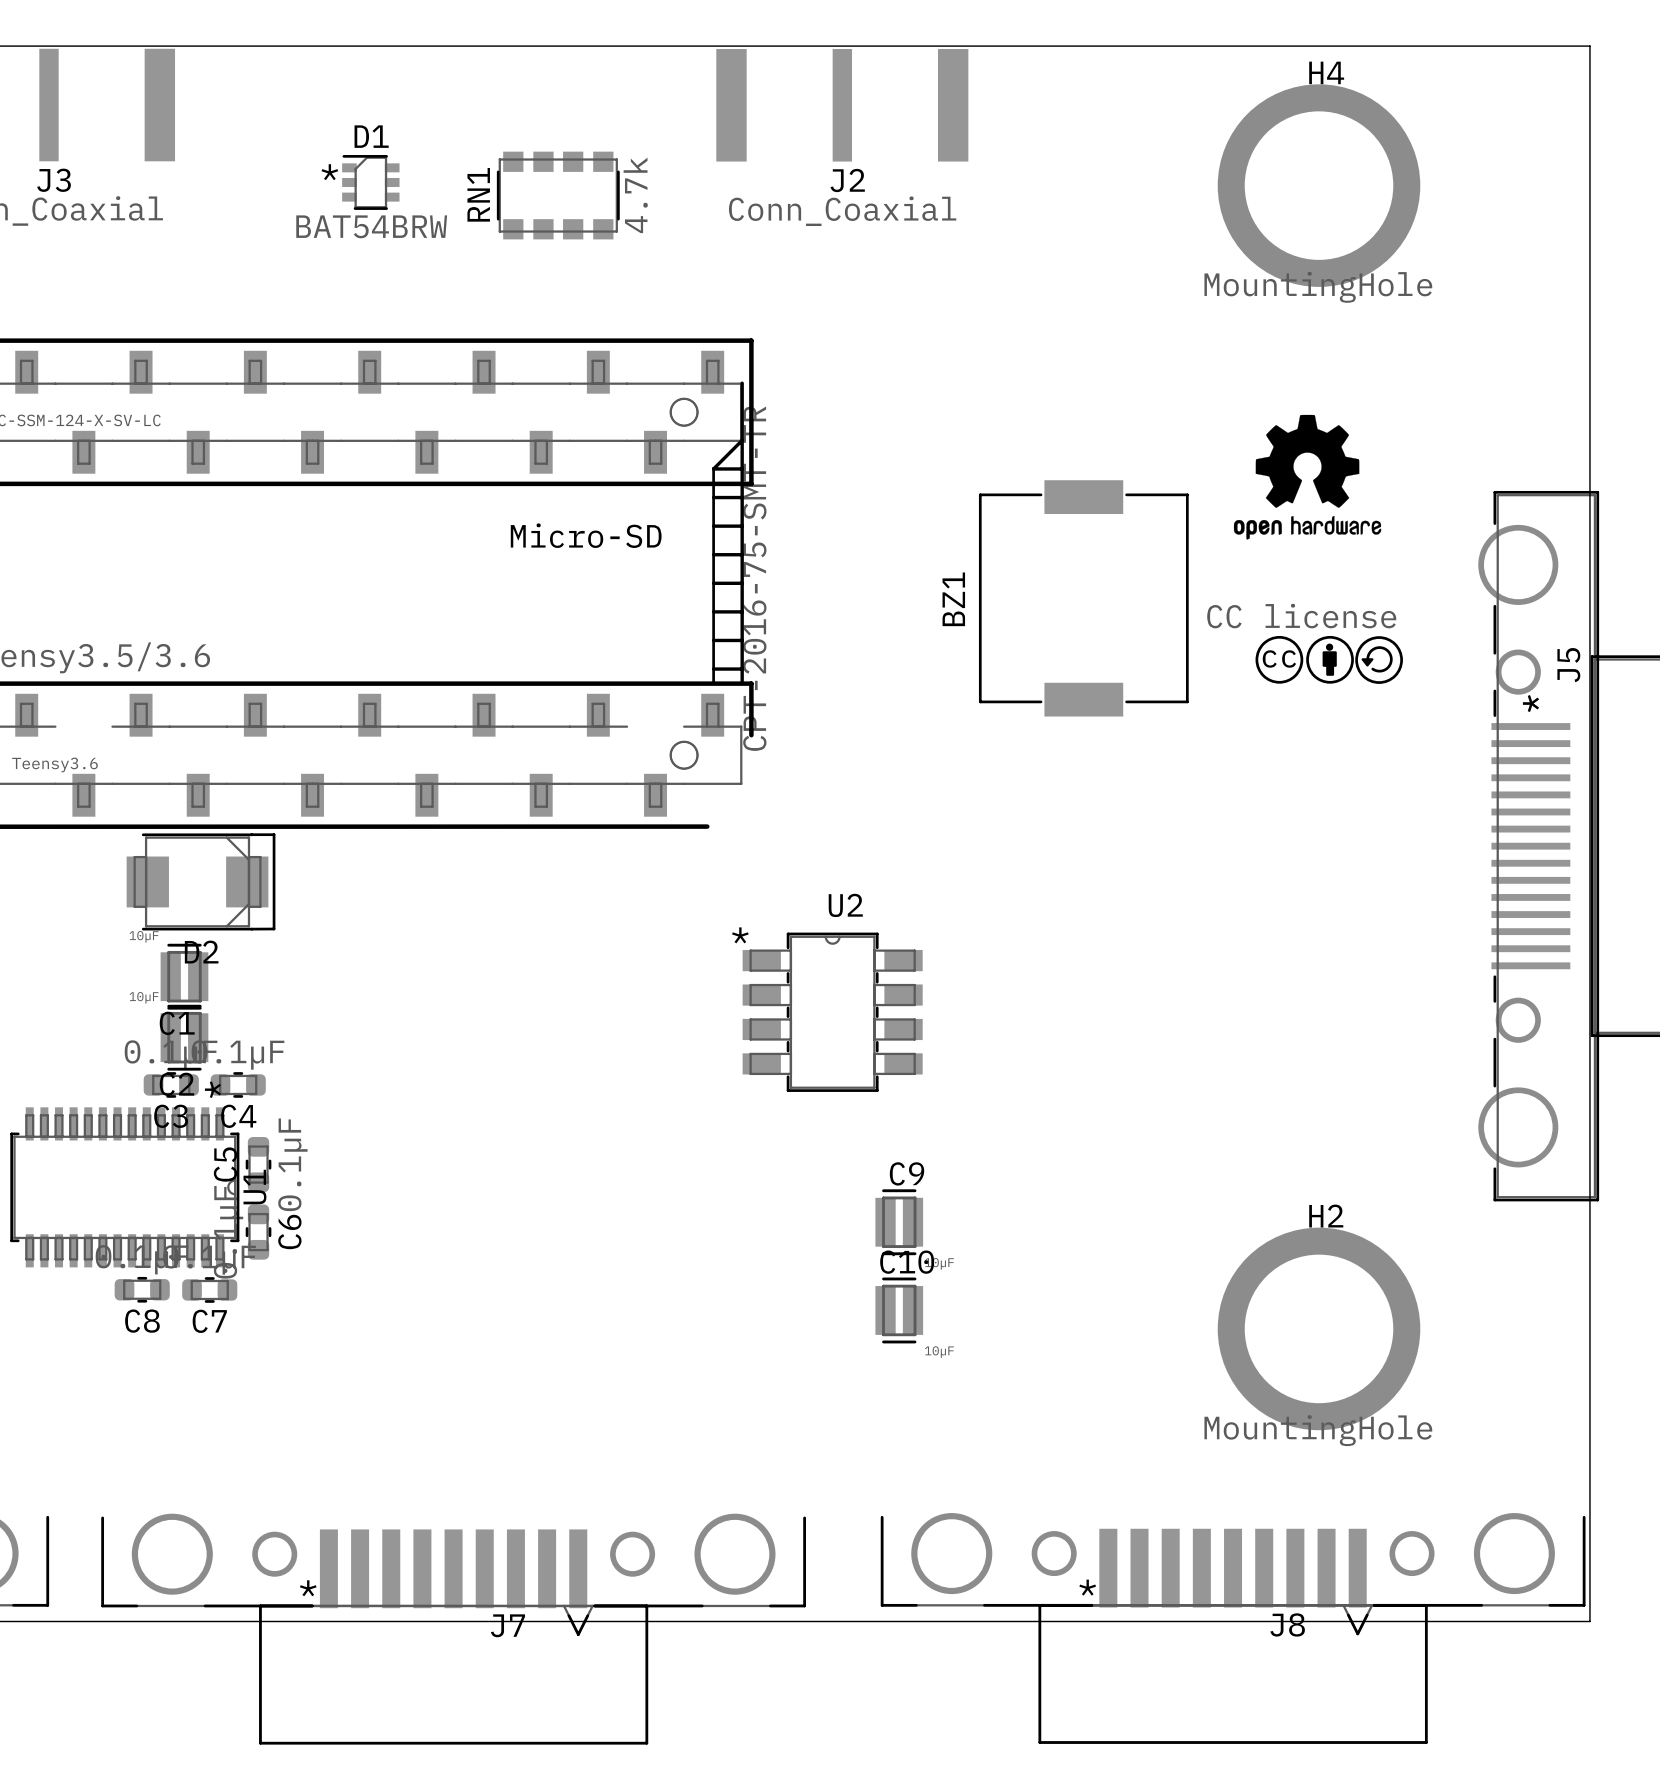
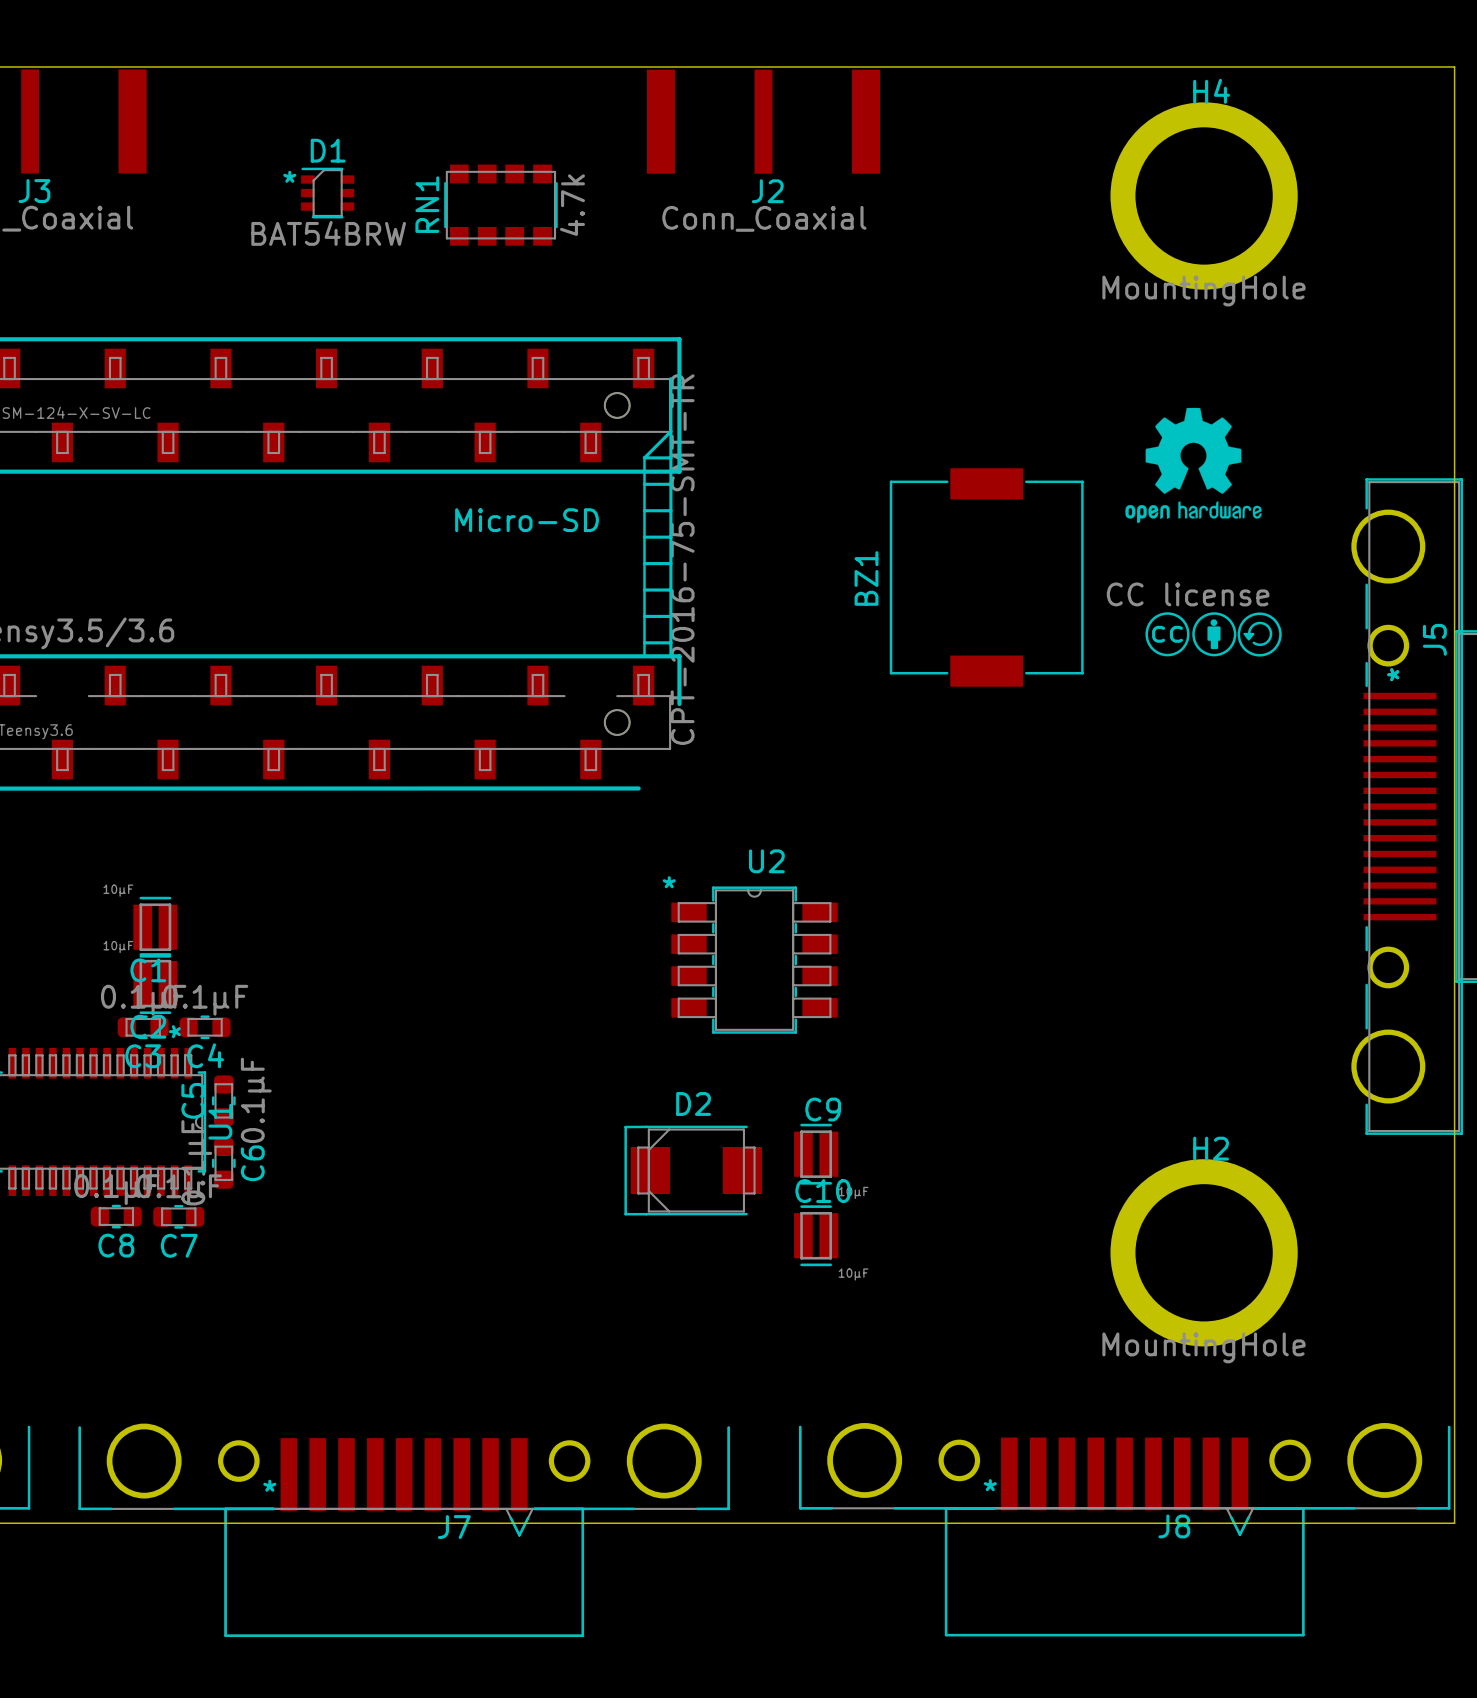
D2 rotation: 0° (201, 881) -> 180° (693, 1170)
D2 position: (201, 881) -> (693, 1170)

